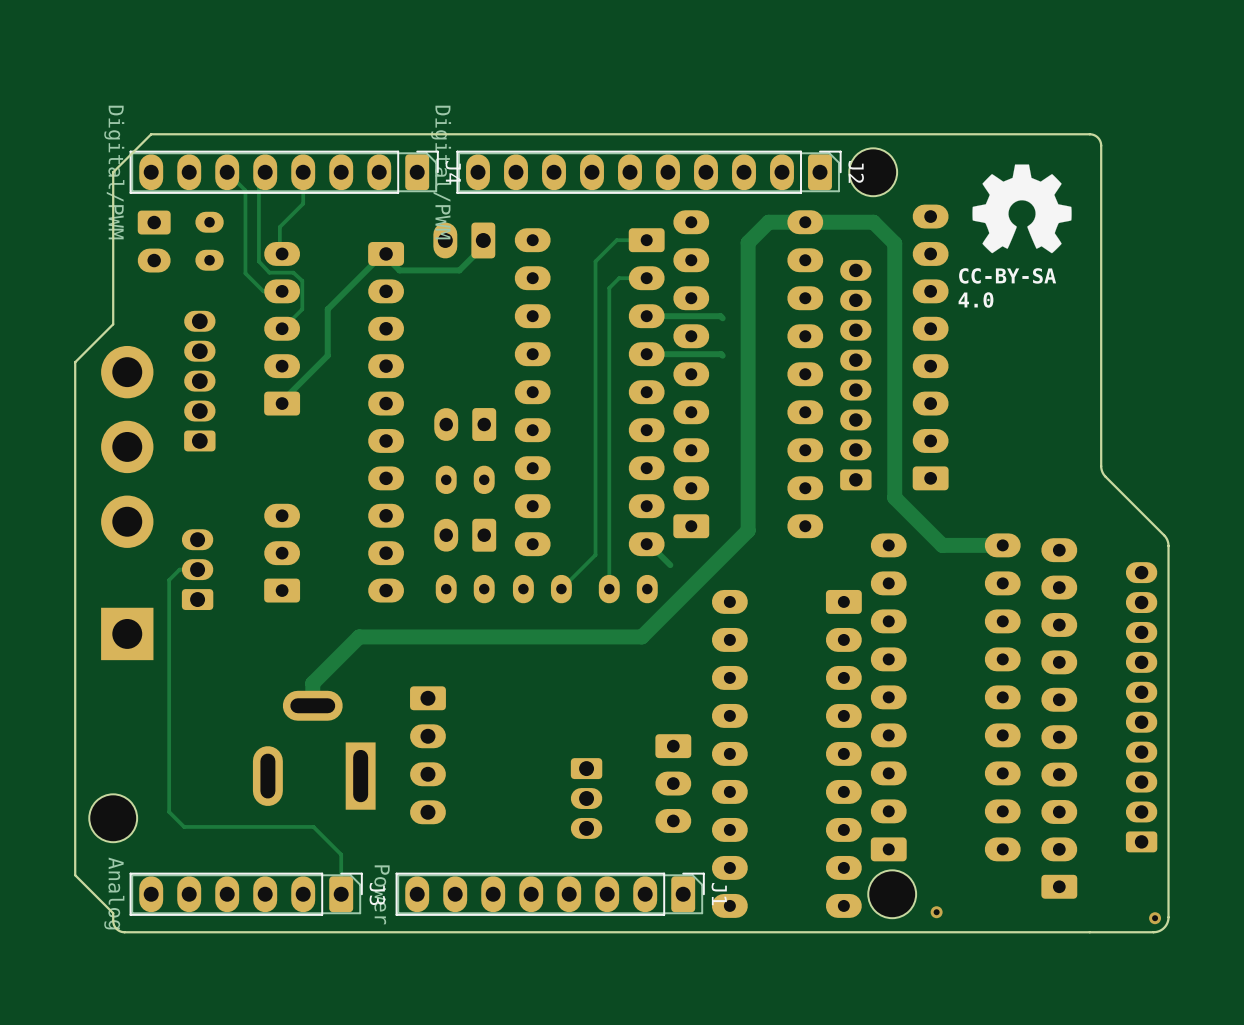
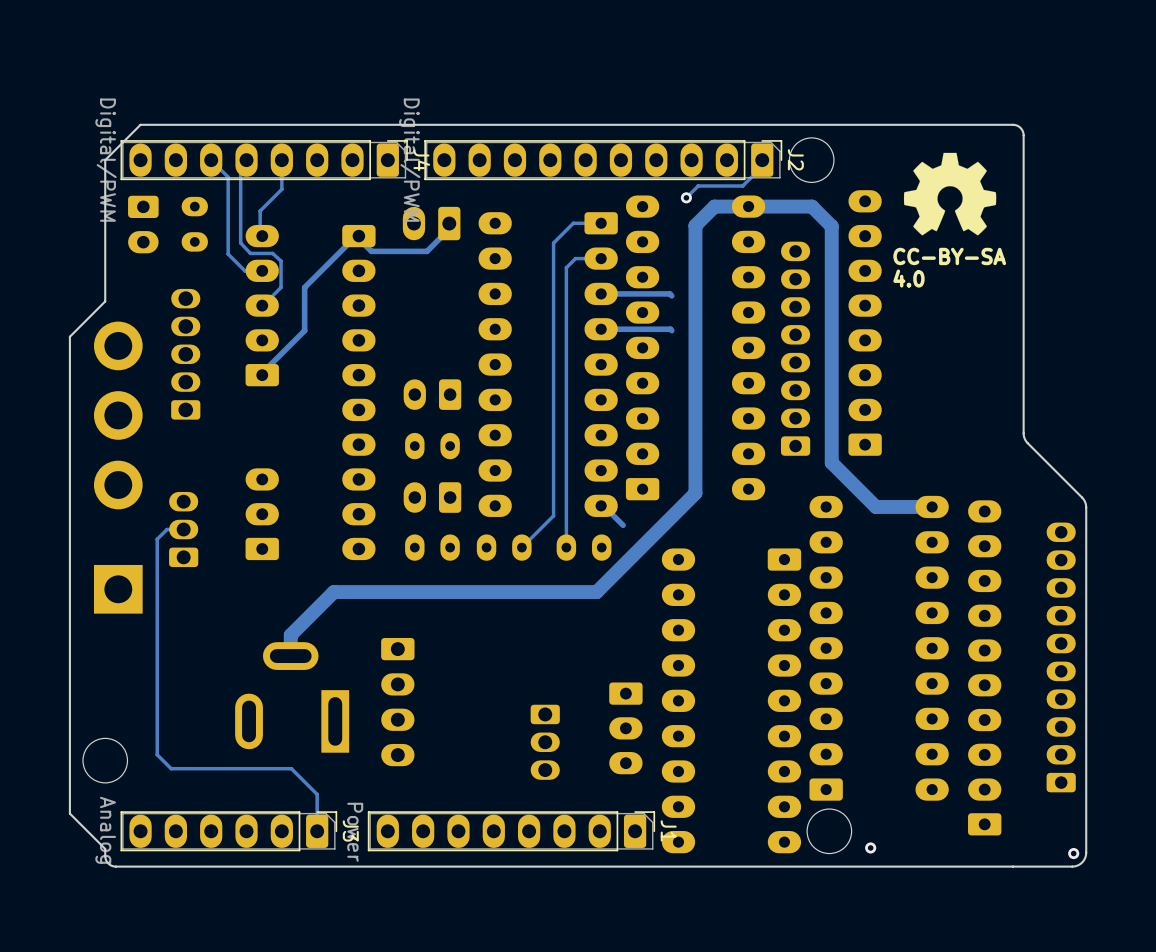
track: none -> (762, 160) (762, 166) (742, 186) (698, 186) (686, 197)
via: none -> (686, 197)

